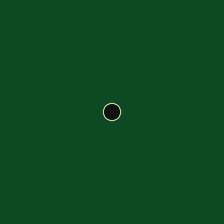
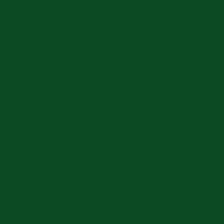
part: (112, 112) -> none

